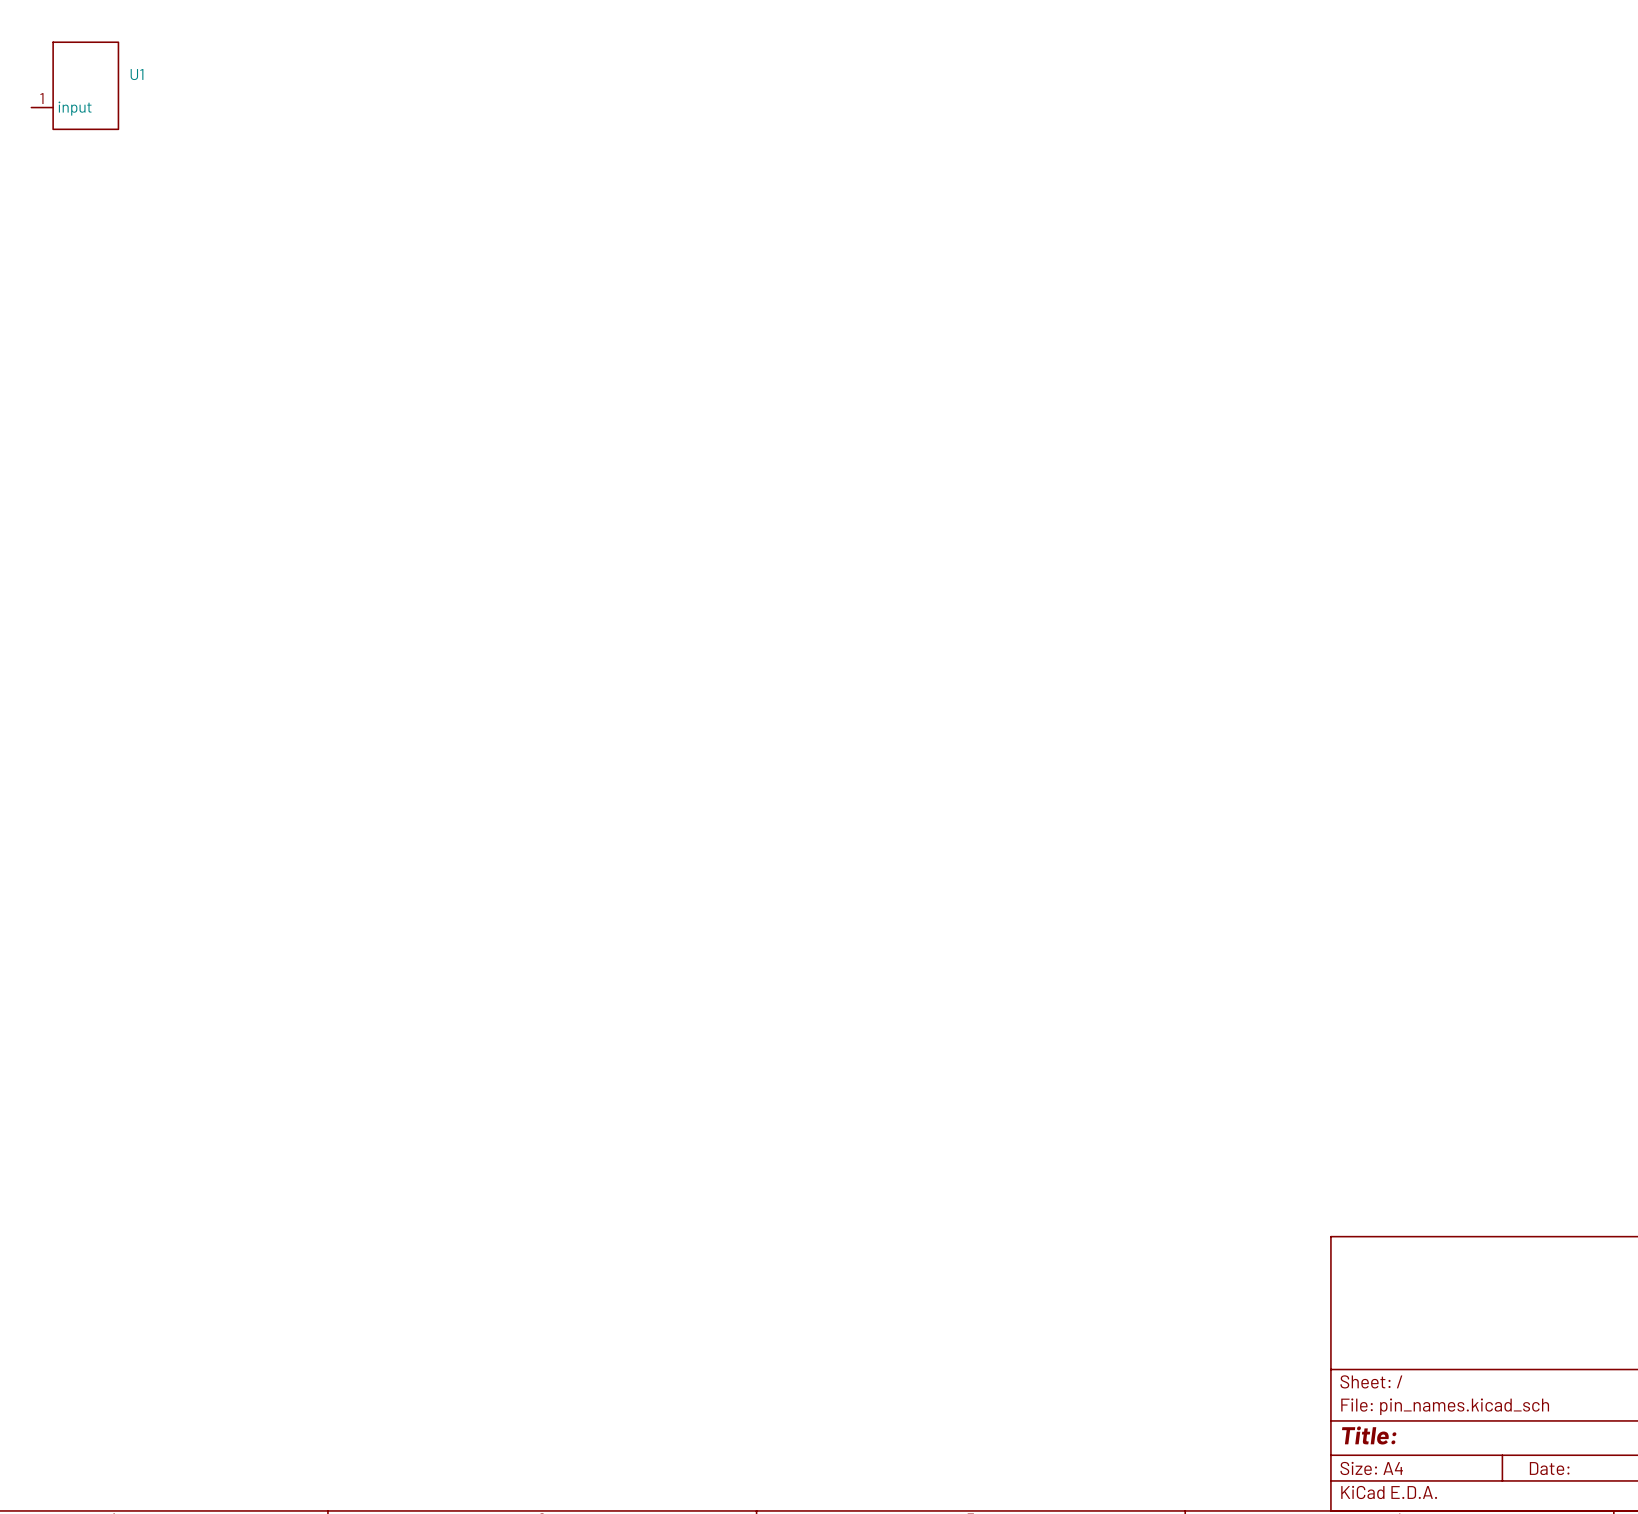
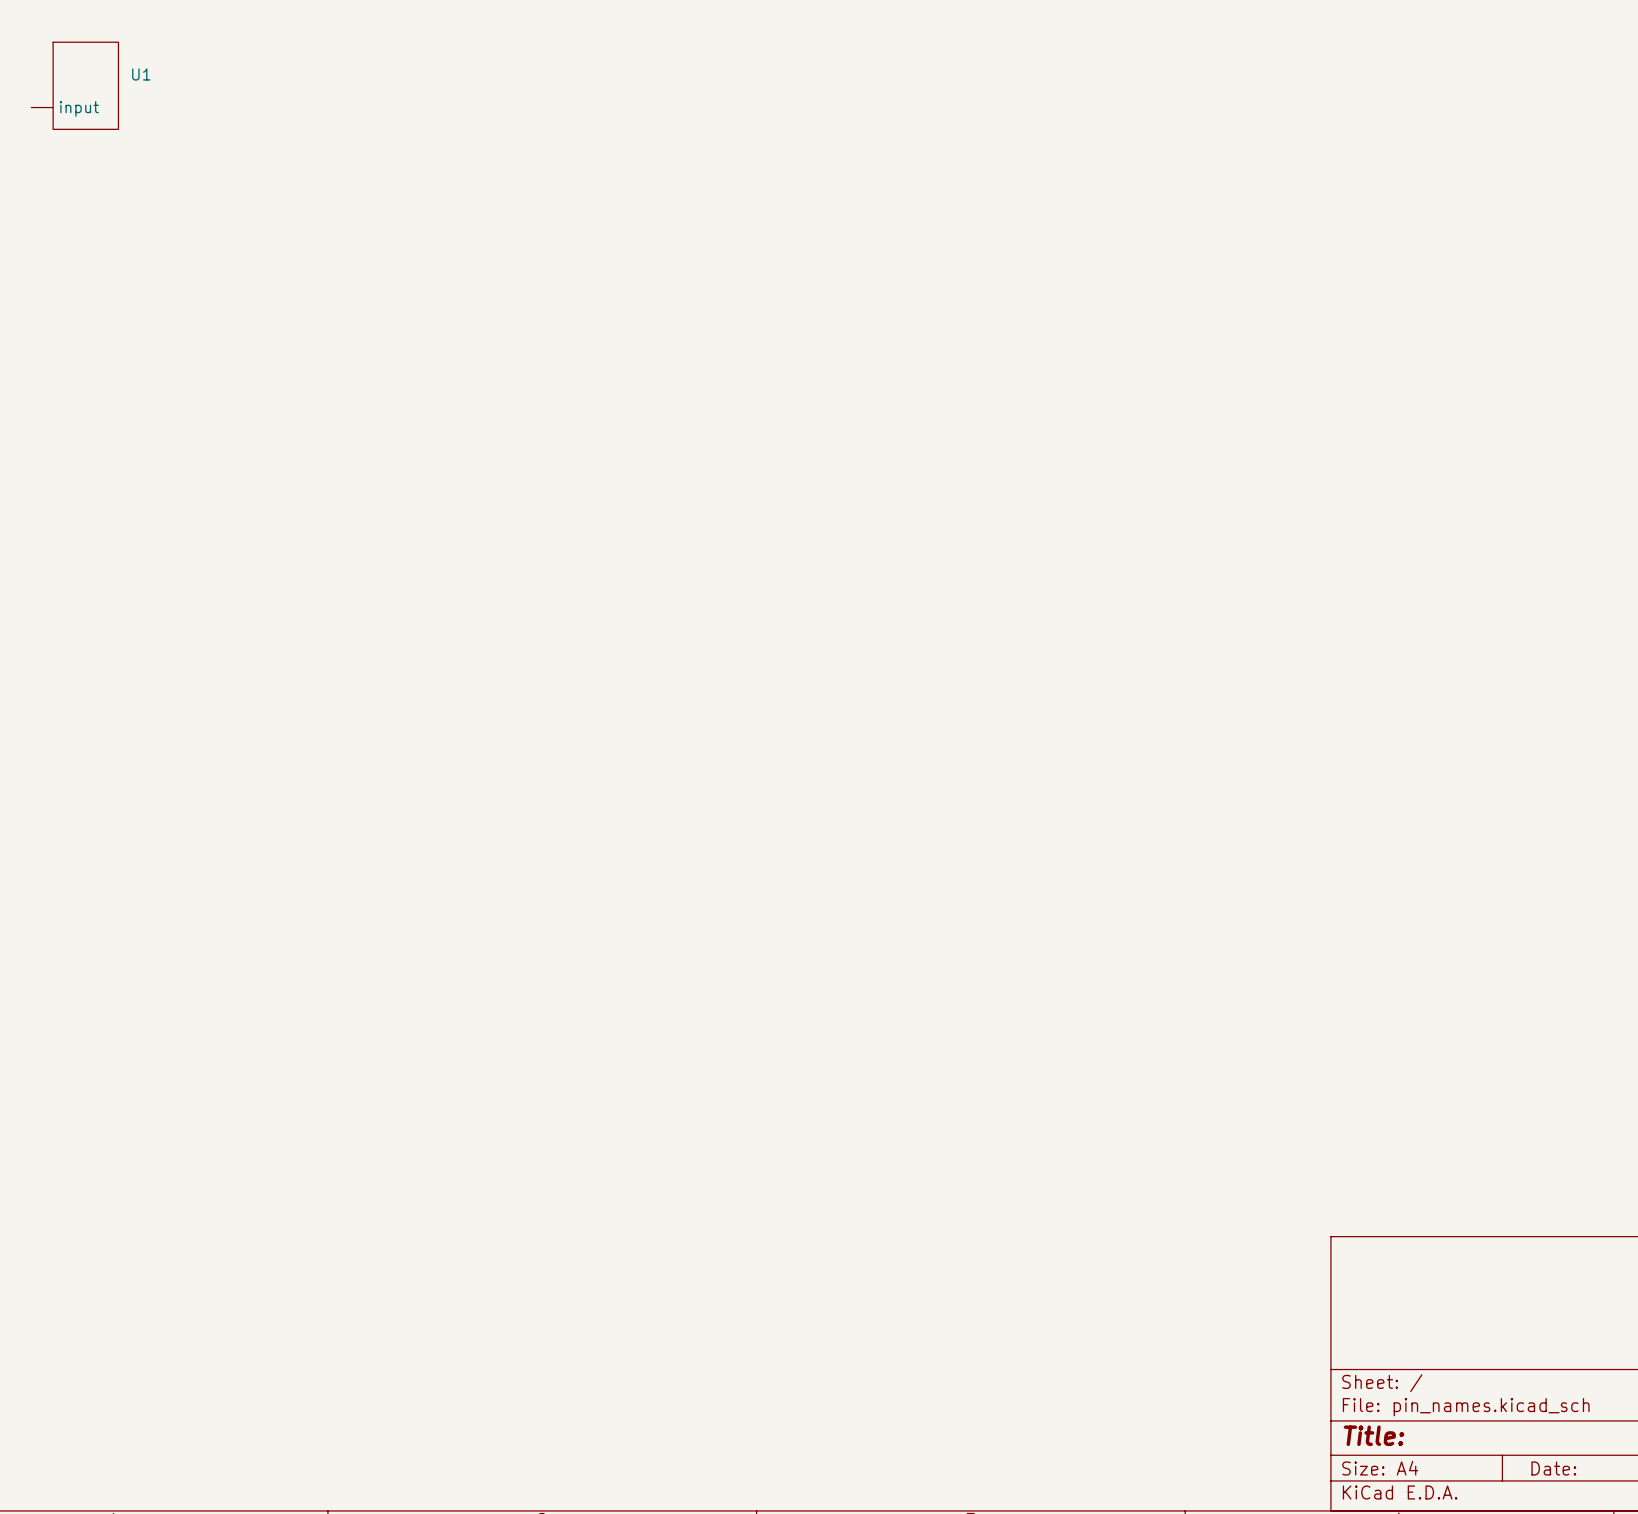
U1 pin number: 1 (41, 98) -> none

